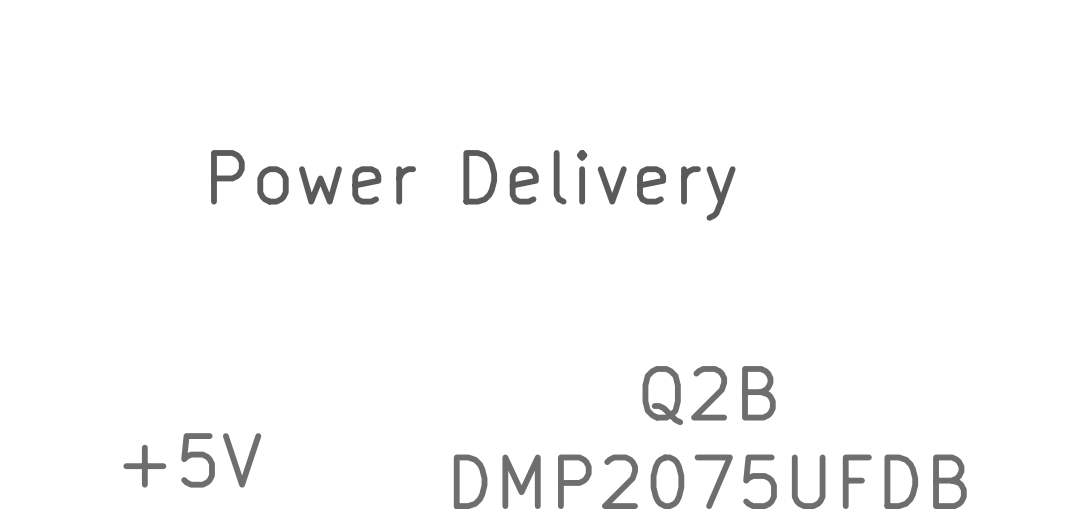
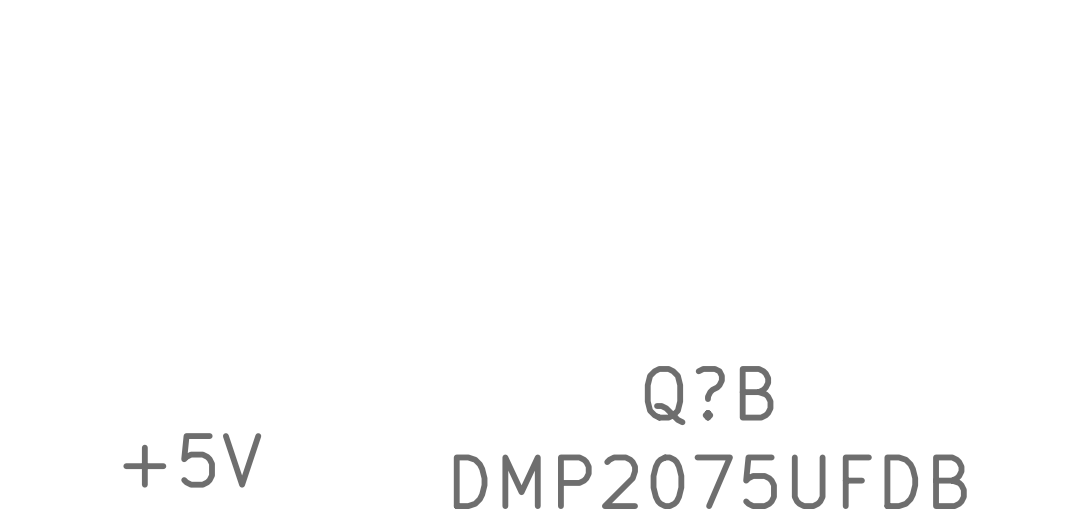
text: Power Delivery (473, 185) -> none
Q2B name: Q2B (709, 395) -> Q?B (709, 395)

